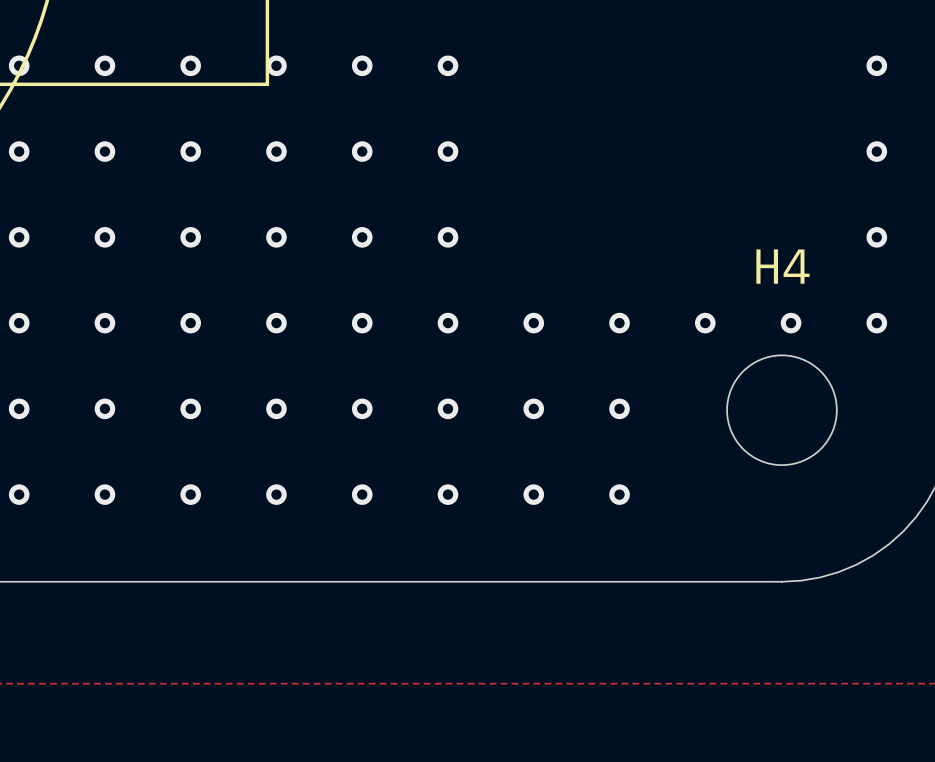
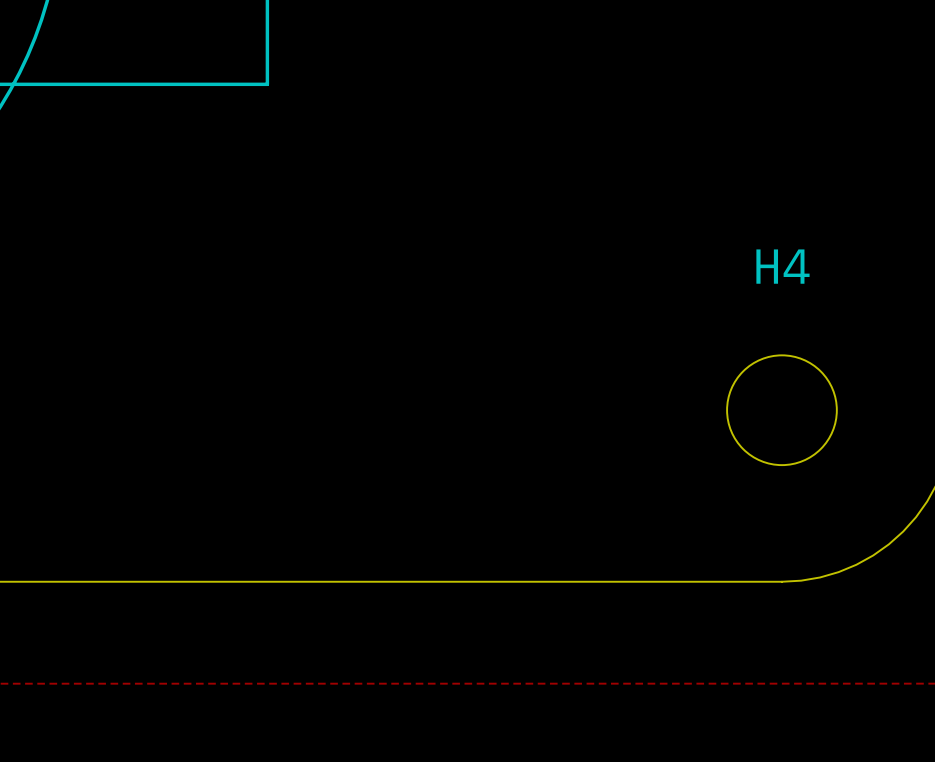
via: (19, 65) -> none
via: (104, 65) -> none
via: (190, 65) -> none
via: (276, 65) -> none
via: (362, 65) -> none
via: (448, 65) -> none
via: (876, 65) -> none
via: (19, 151) -> none
via: (104, 151) -> none
via: (190, 151) -> none
via: (276, 151) -> none
via: (362, 151) -> none
via: (448, 151) -> none
via: (876, 151) -> none
via: (19, 237) -> none
via: (104, 237) -> none
via: (190, 237) -> none
via: (276, 237) -> none
via: (362, 237) -> none
via: (448, 237) -> none
via: (876, 237) -> none
via: (19, 323) -> none
via: (104, 323) -> none
via: (190, 323) -> none
via: (276, 323) -> none
via: (362, 323) -> none
via: (448, 323) -> none
via: (533, 323) -> none
via: (619, 323) -> none
via: (705, 323) -> none
via: (791, 323) -> none
via: (876, 323) -> none
via: (19, 408) -> none
via: (104, 408) -> none
via: (190, 408) -> none
via: (276, 408) -> none
via: (362, 408) -> none
via: (448, 408) -> none
via: (533, 408) -> none
via: (619, 408) -> none
via: (19, 494) -> none
via: (104, 494) -> none
via: (190, 494) -> none
via: (276, 494) -> none
via: (362, 494) -> none
via: (448, 494) -> none
via: (533, 494) -> none
via: (619, 494) -> none

